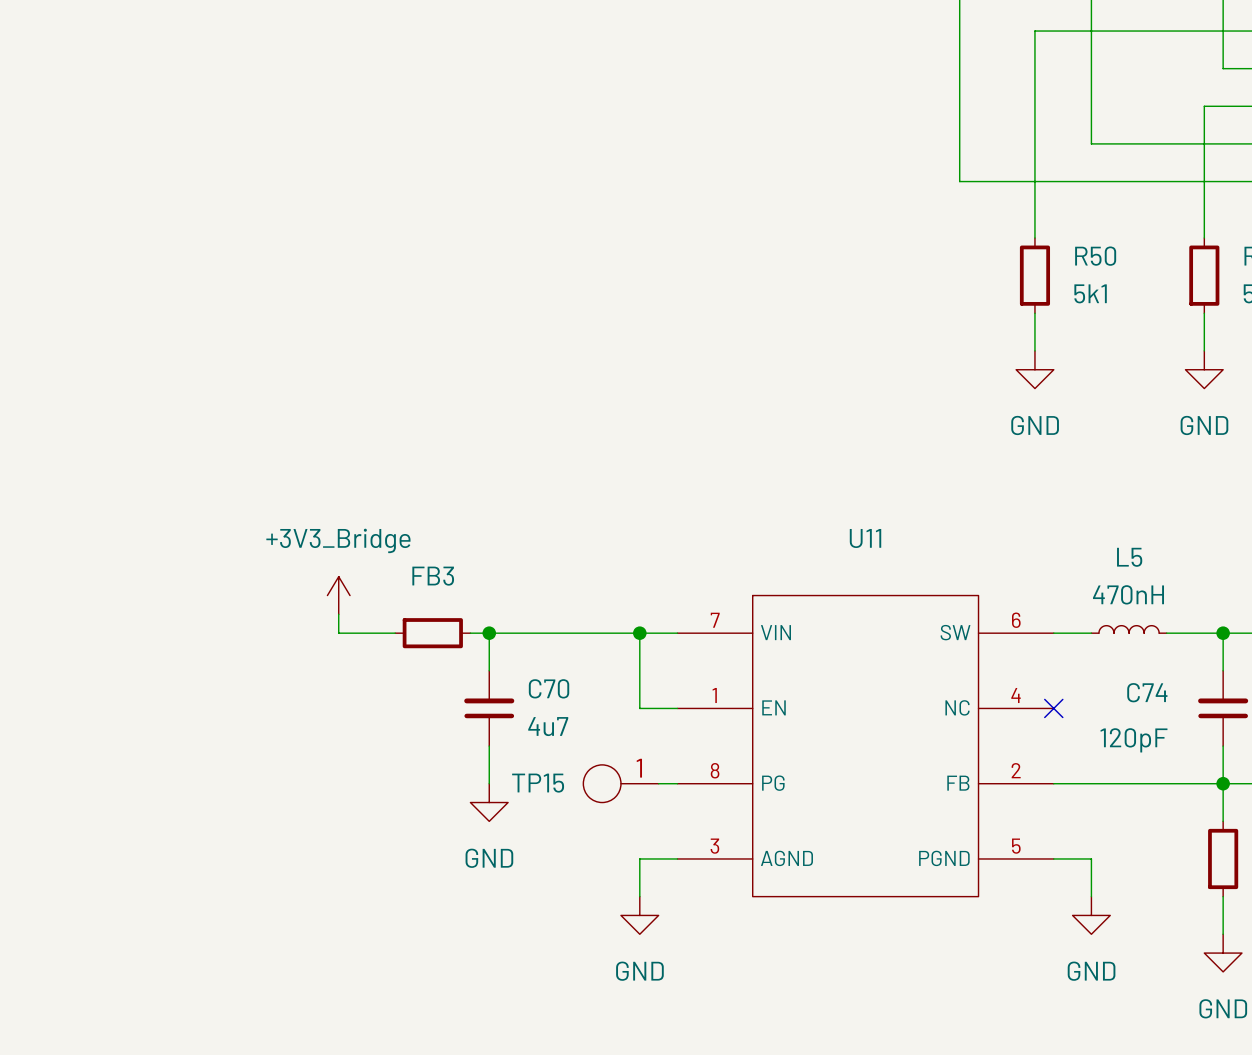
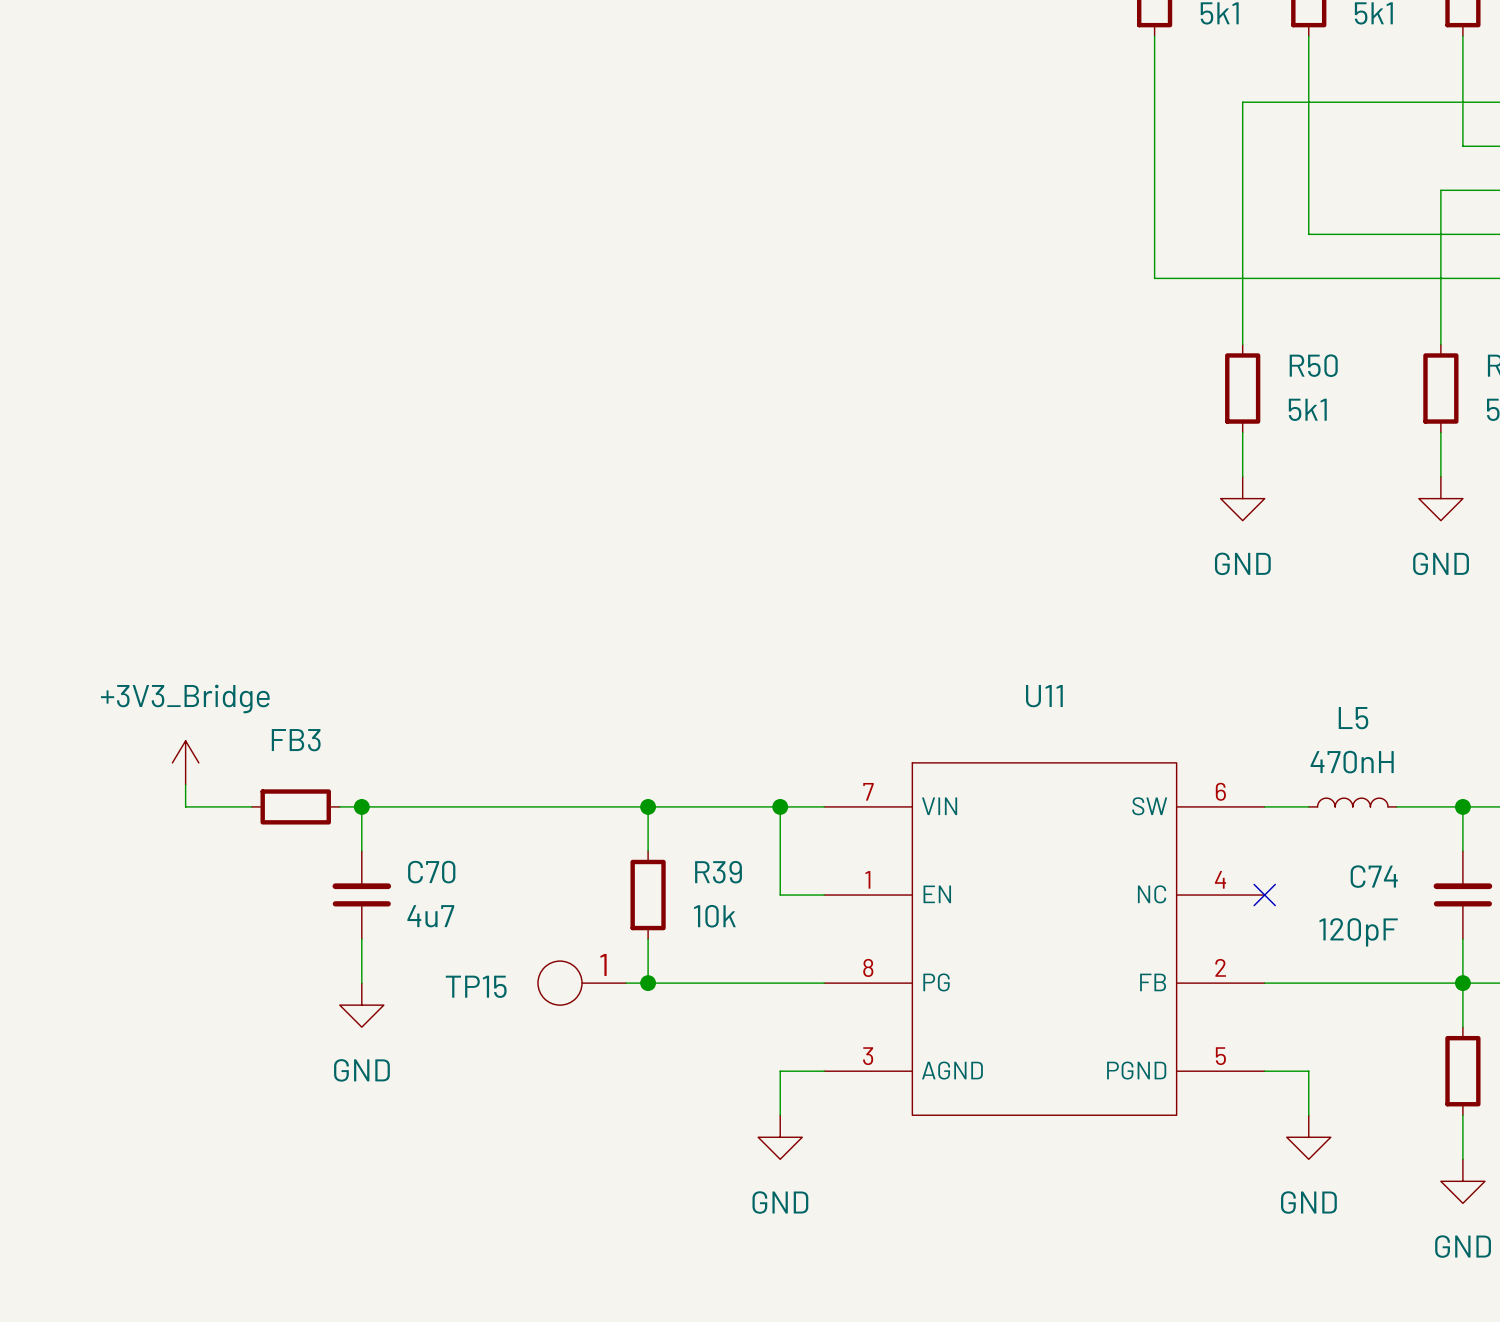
power symbol position: +3V3_Bridge (338, 595) -> +3V3_Bridge (185, 762)
wire: none -> (185, 784) (185, 806) (251, 806)
wire: (338, 614) (338, 633) -> (339, 806) (427, 806)
wire: none -> (361, 806) (361, 850)
junction: none -> (361, 806)
wire: none -> (493, 806) (582, 806)
FB3 position: (432, 633) -> (295, 806)
wire: (489, 633) (489, 670) -> (648, 806) (648, 850)
junction position: (489, 633) -> (648, 806)
C70 position: (489, 708) -> (361, 895)
R39: none -> (648, 895)
wire: none -> (361, 939) (361, 983)
wire: (489, 746) (489, 783) -> (648, 939) (648, 983)
wire: none -> (626, 983) (802, 983)
junction: none -> (648, 983)
TP15 name position: TP15 (538, 783) -> TP15 (476, 986)
TP15 position: (620, 783) -> (582, 983)
power symbol position: GND (489, 802) -> GND (361, 1005)

